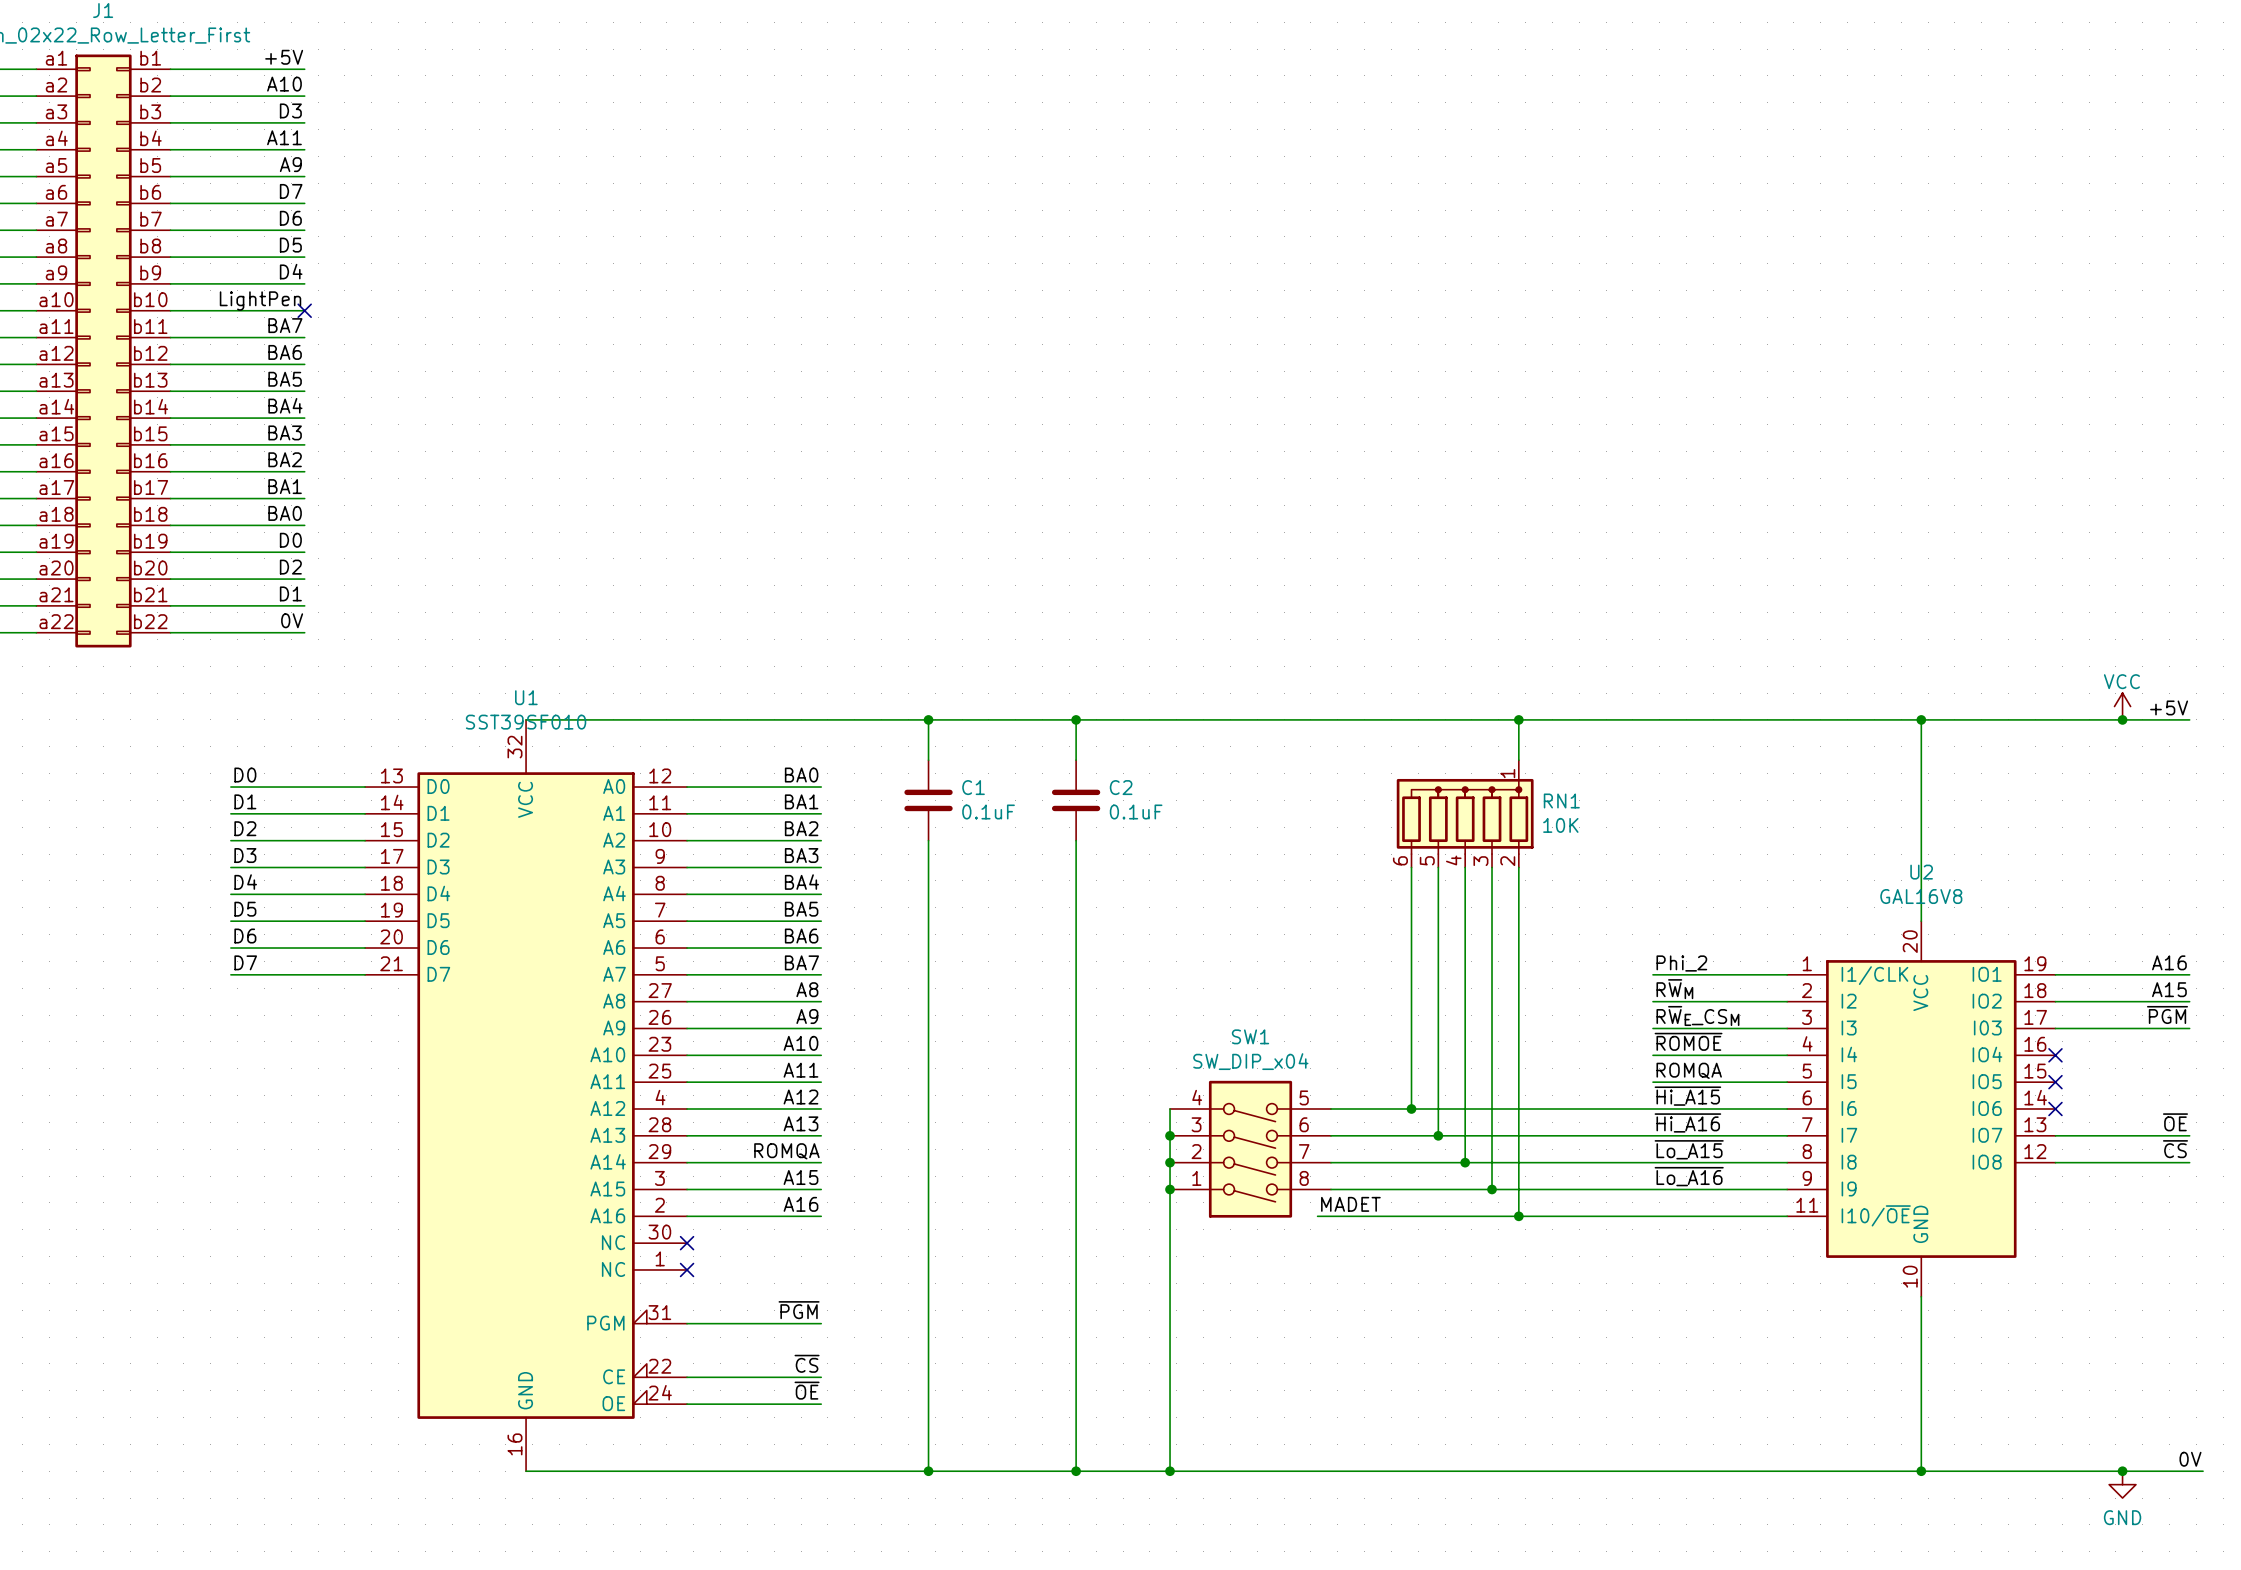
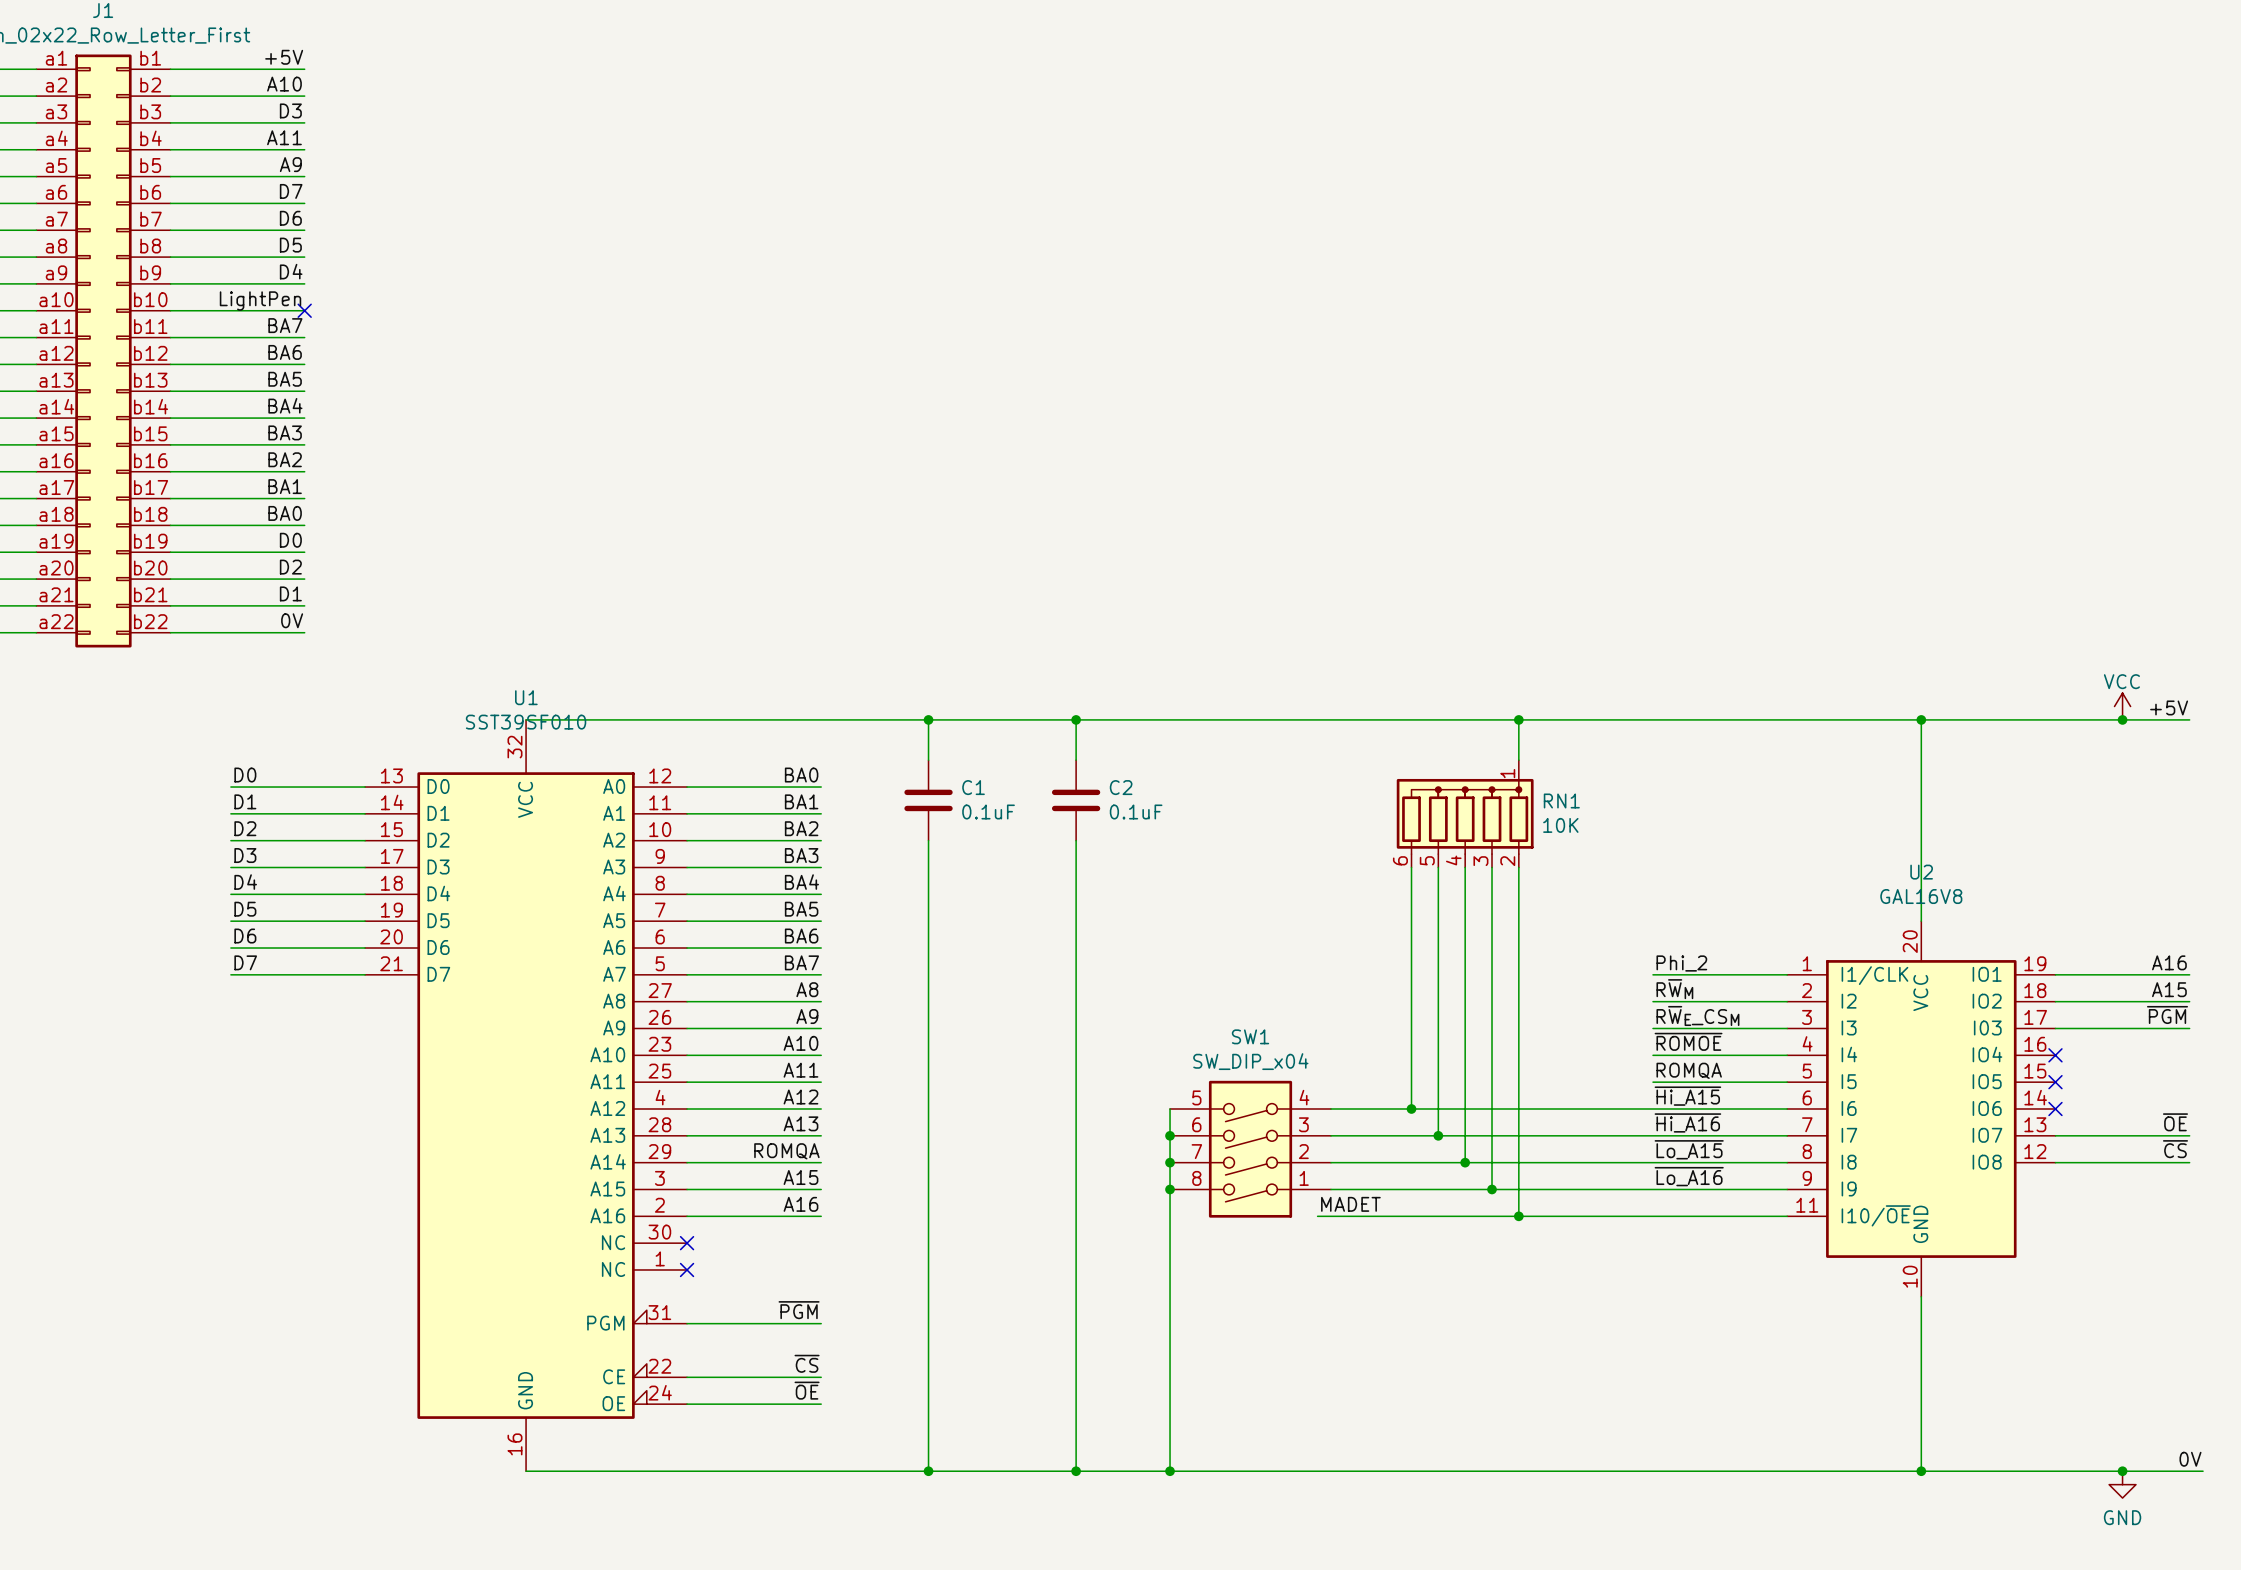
SW1 flip: as is (1250, 1149) -> left-right (1250, 1149)

